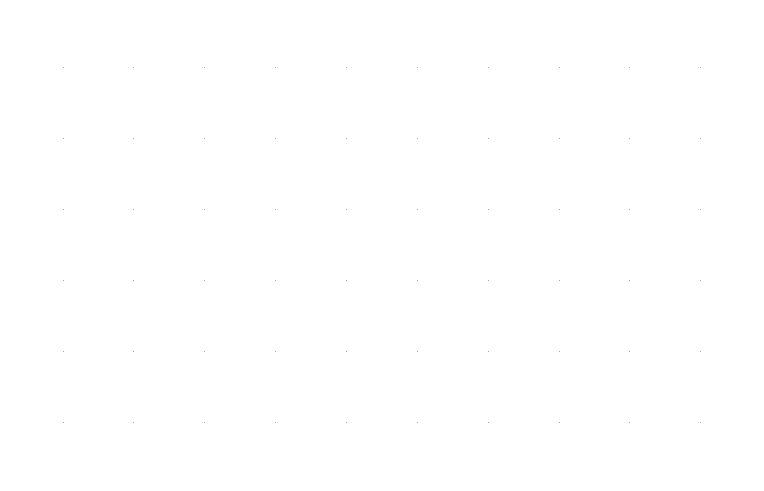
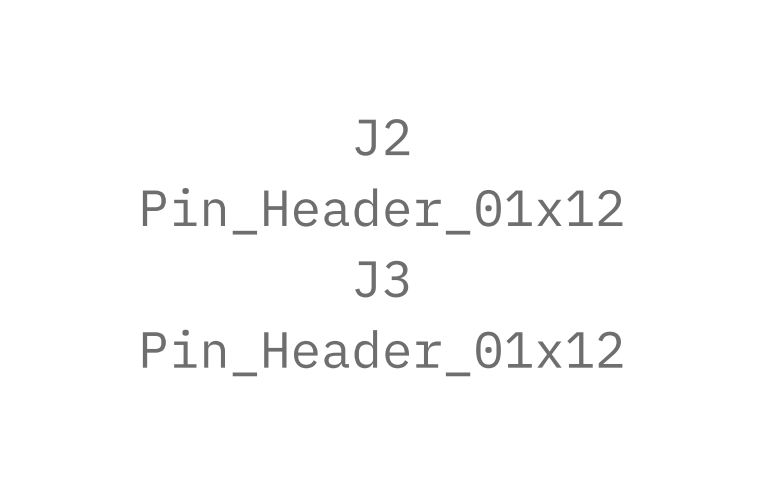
J2: none -> Pin_Header_01x12 (382, 176)
J3: none -> Pin_Header_01x12 (382, 318)

